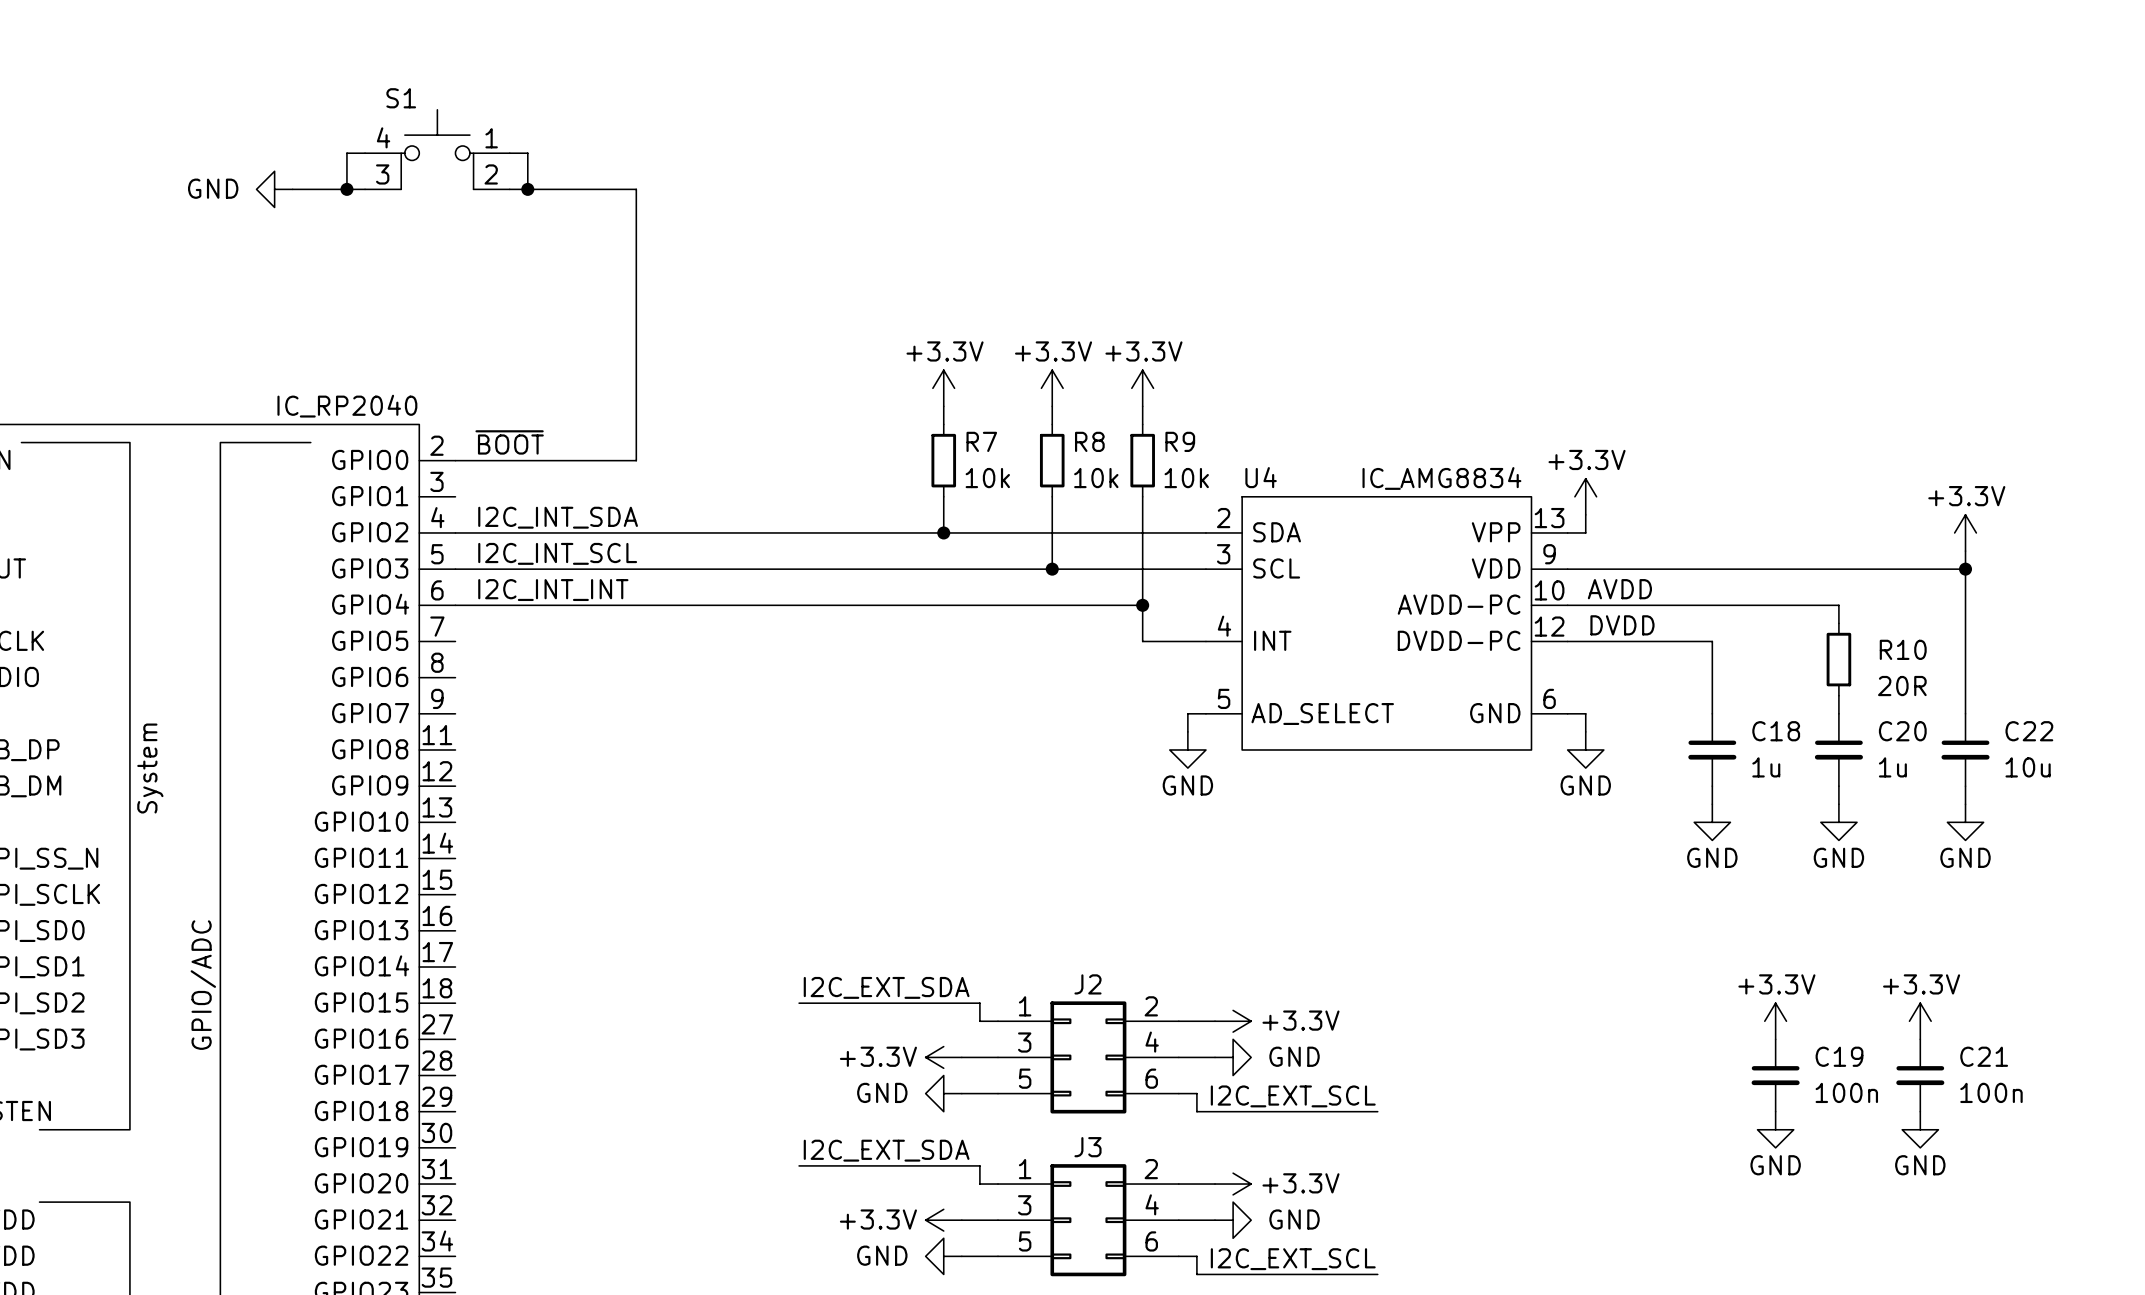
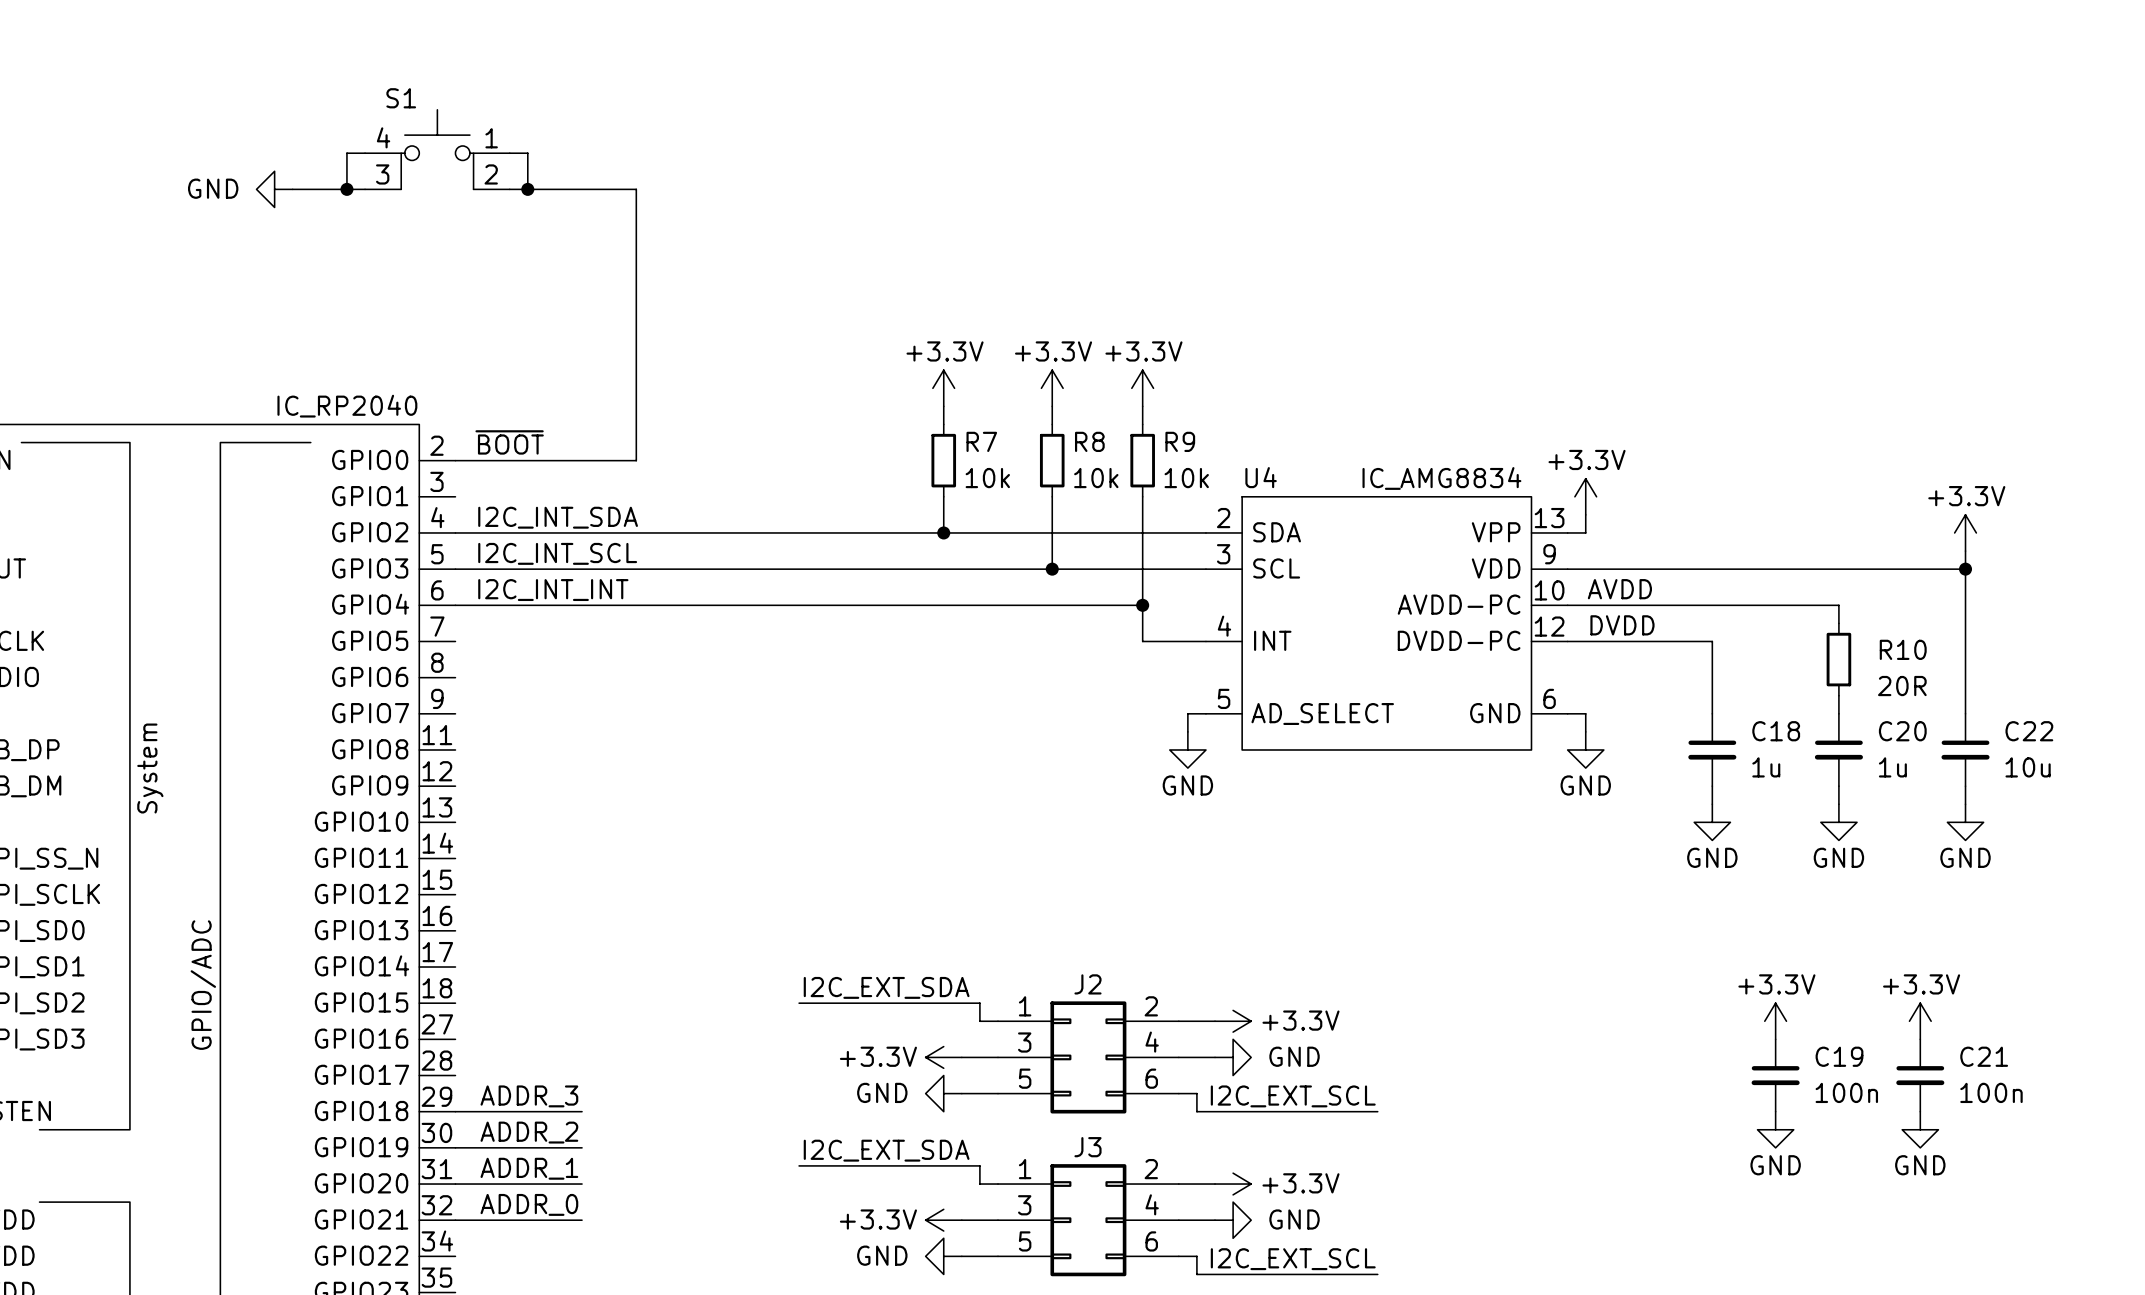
label: none -> ADDR_3 (529, 1096)
wire: none -> (455, 1111) (582, 1111)
label: none -> ADDR_2 (529, 1132)
wire: none -> (455, 1147) (582, 1147)
label: none -> ADDR_1 (529, 1168)
wire: none -> (455, 1184) (582, 1184)
label: none -> ADDR_0 (529, 1204)
wire: none -> (455, 1220) (582, 1220)

